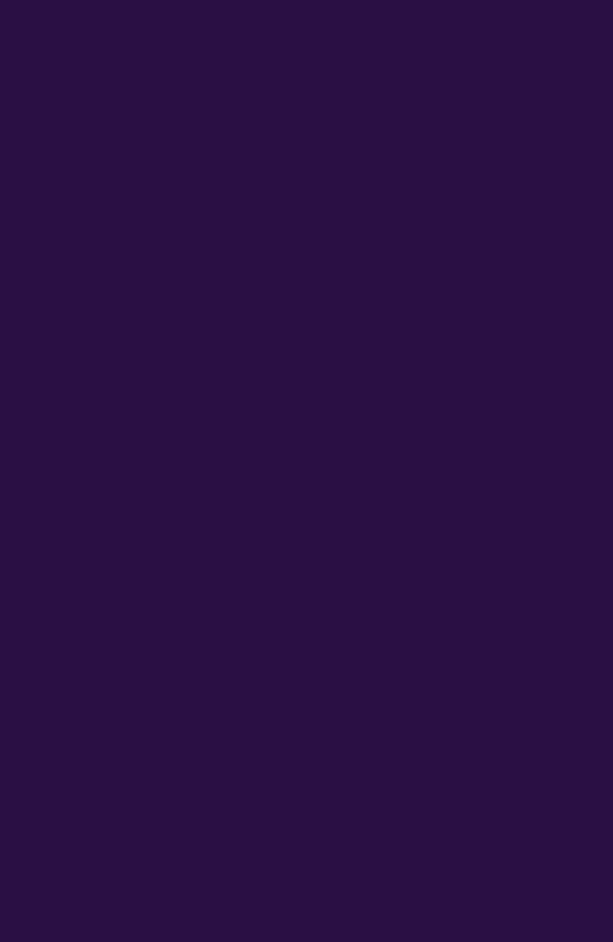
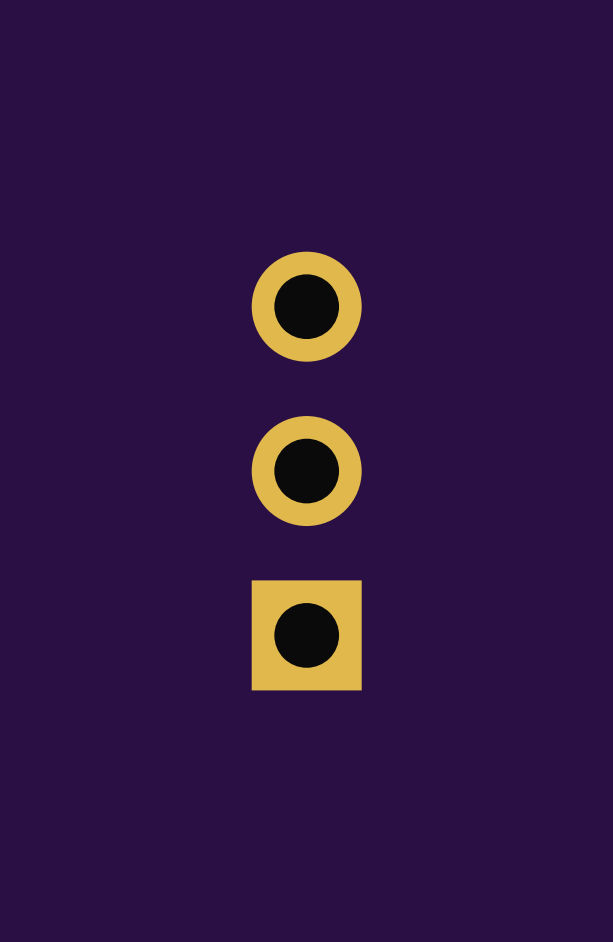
part: none -> (306, 471)

